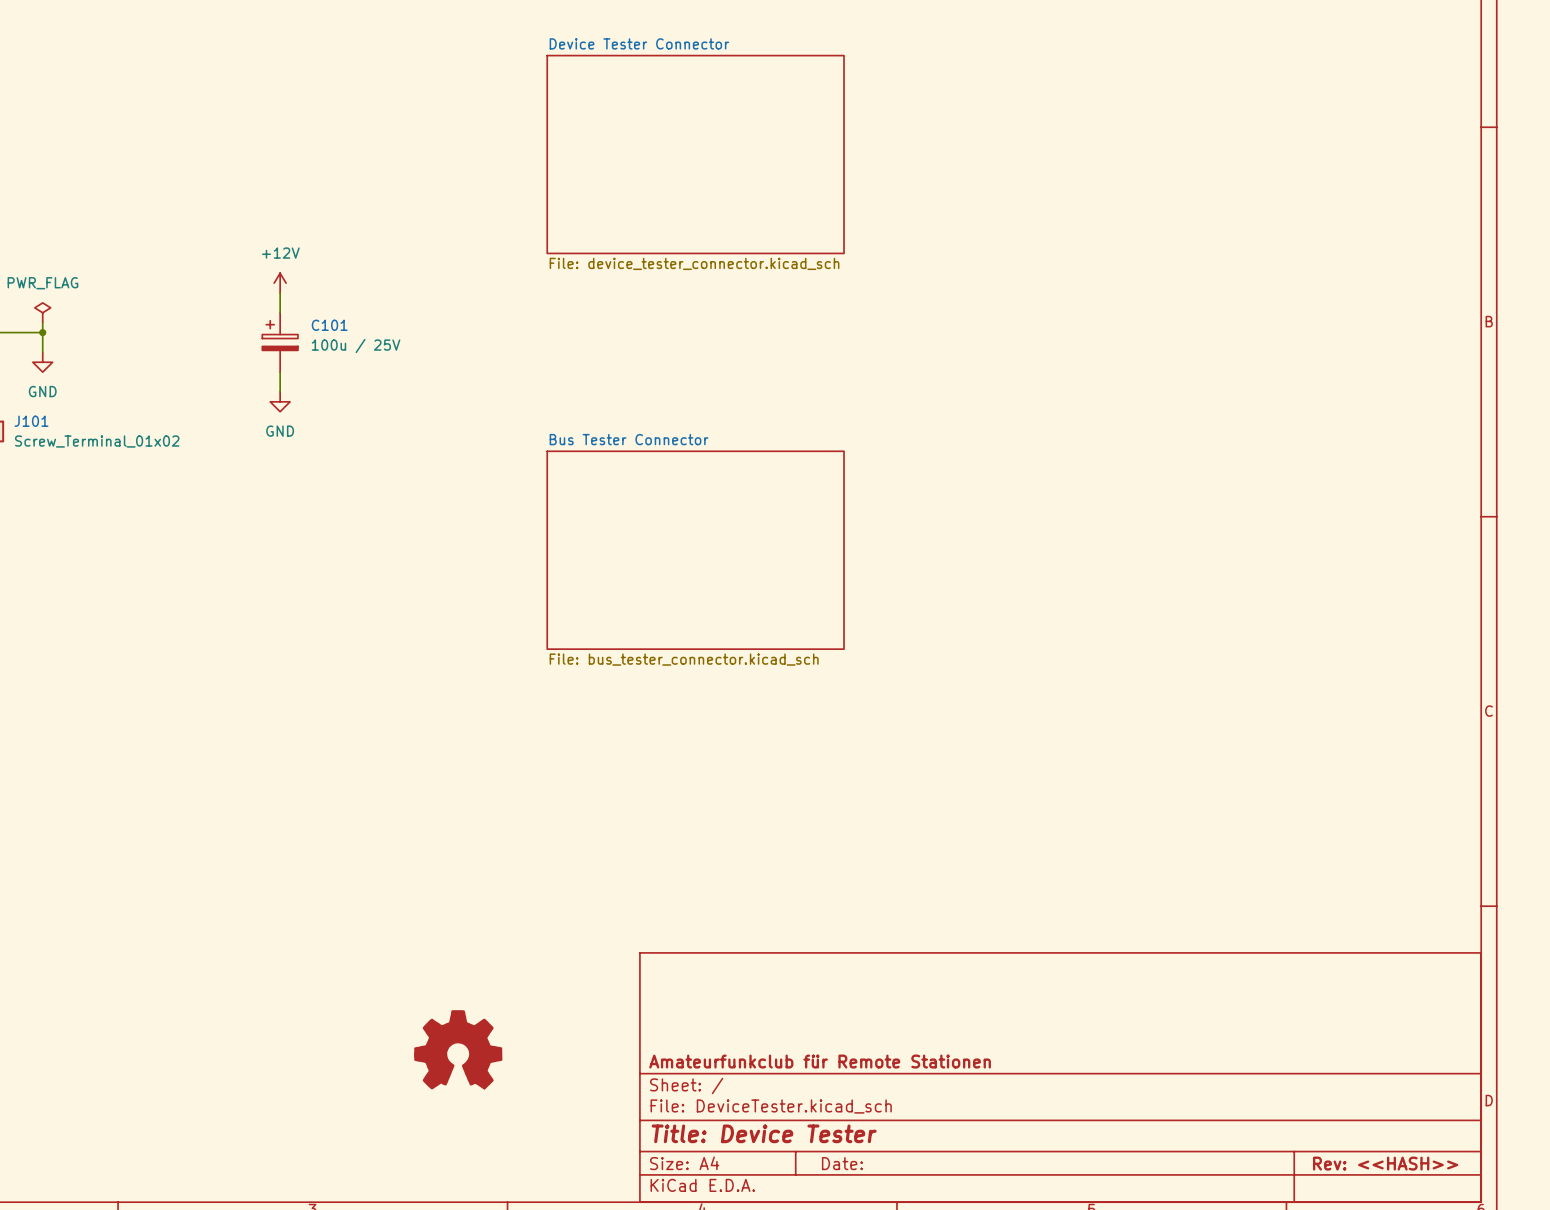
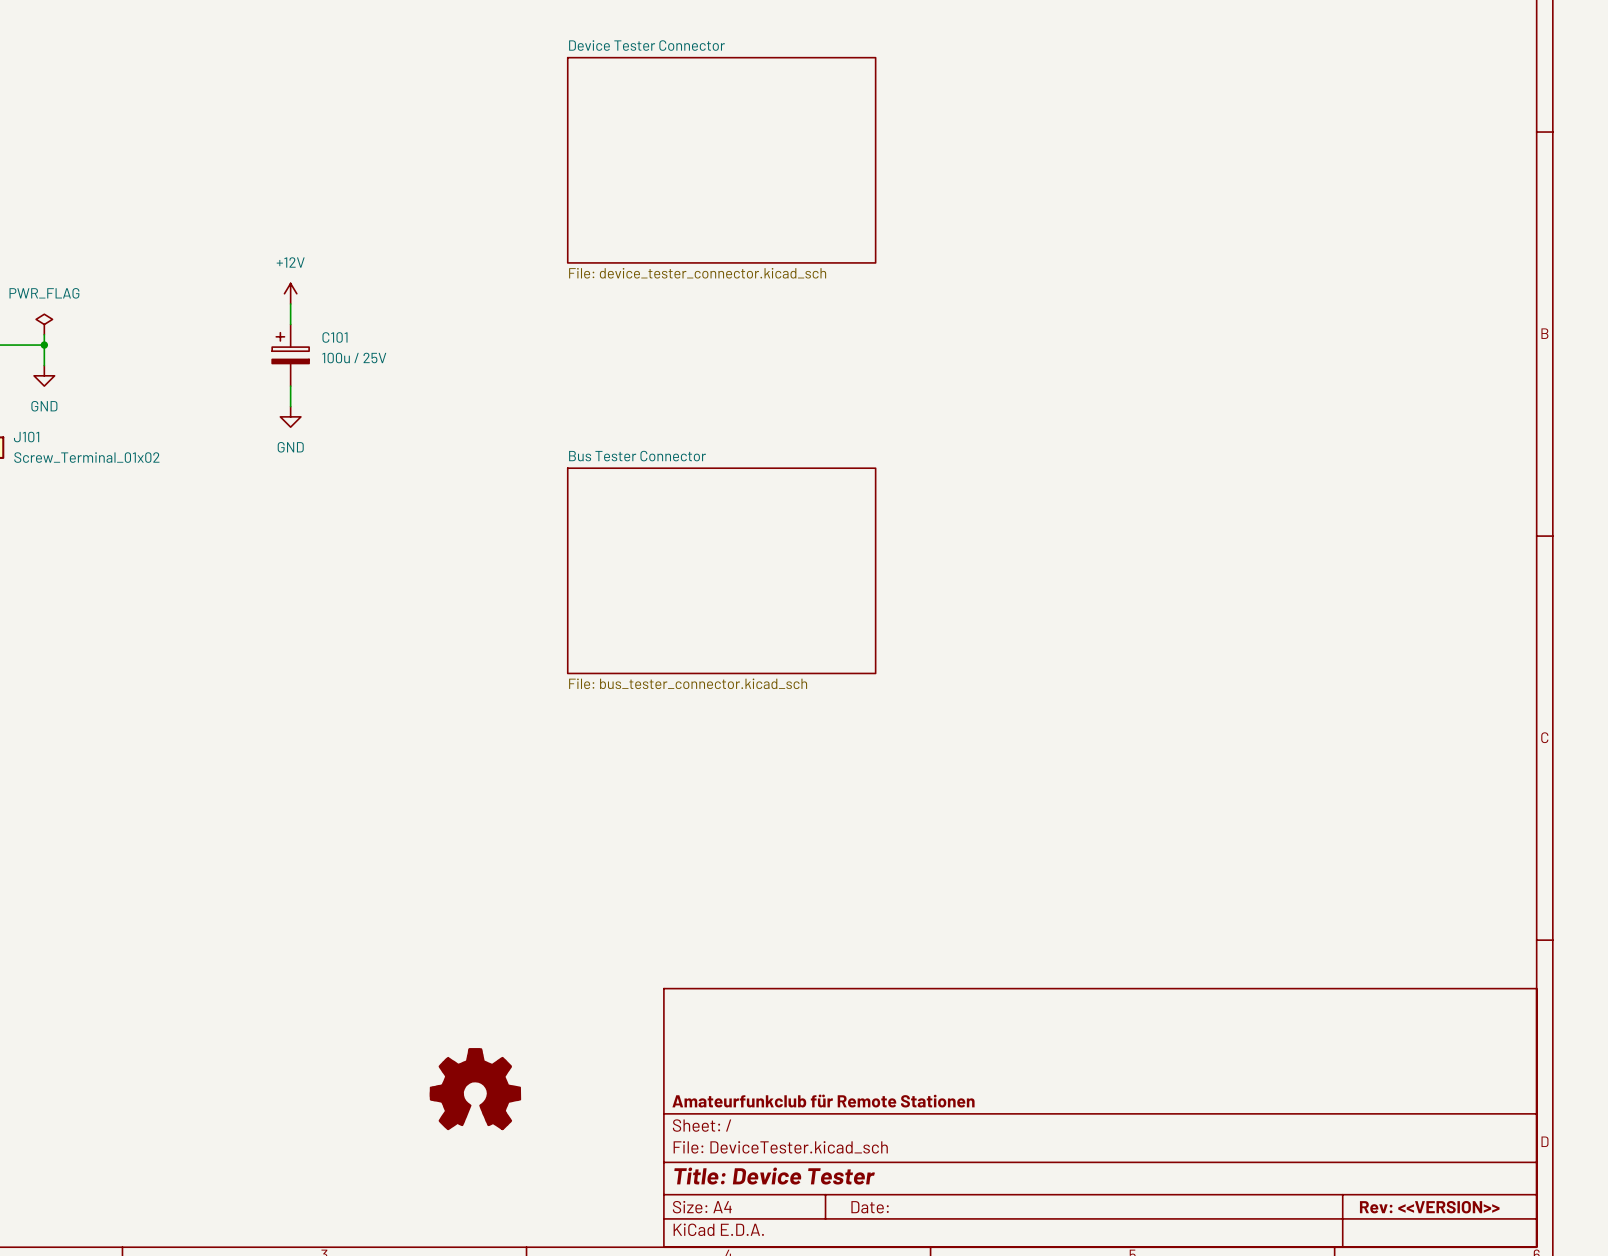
title block: Rev: <<HASH>> (1385, 1163) -> Rev: <<VERSION>> (1429, 1207)

